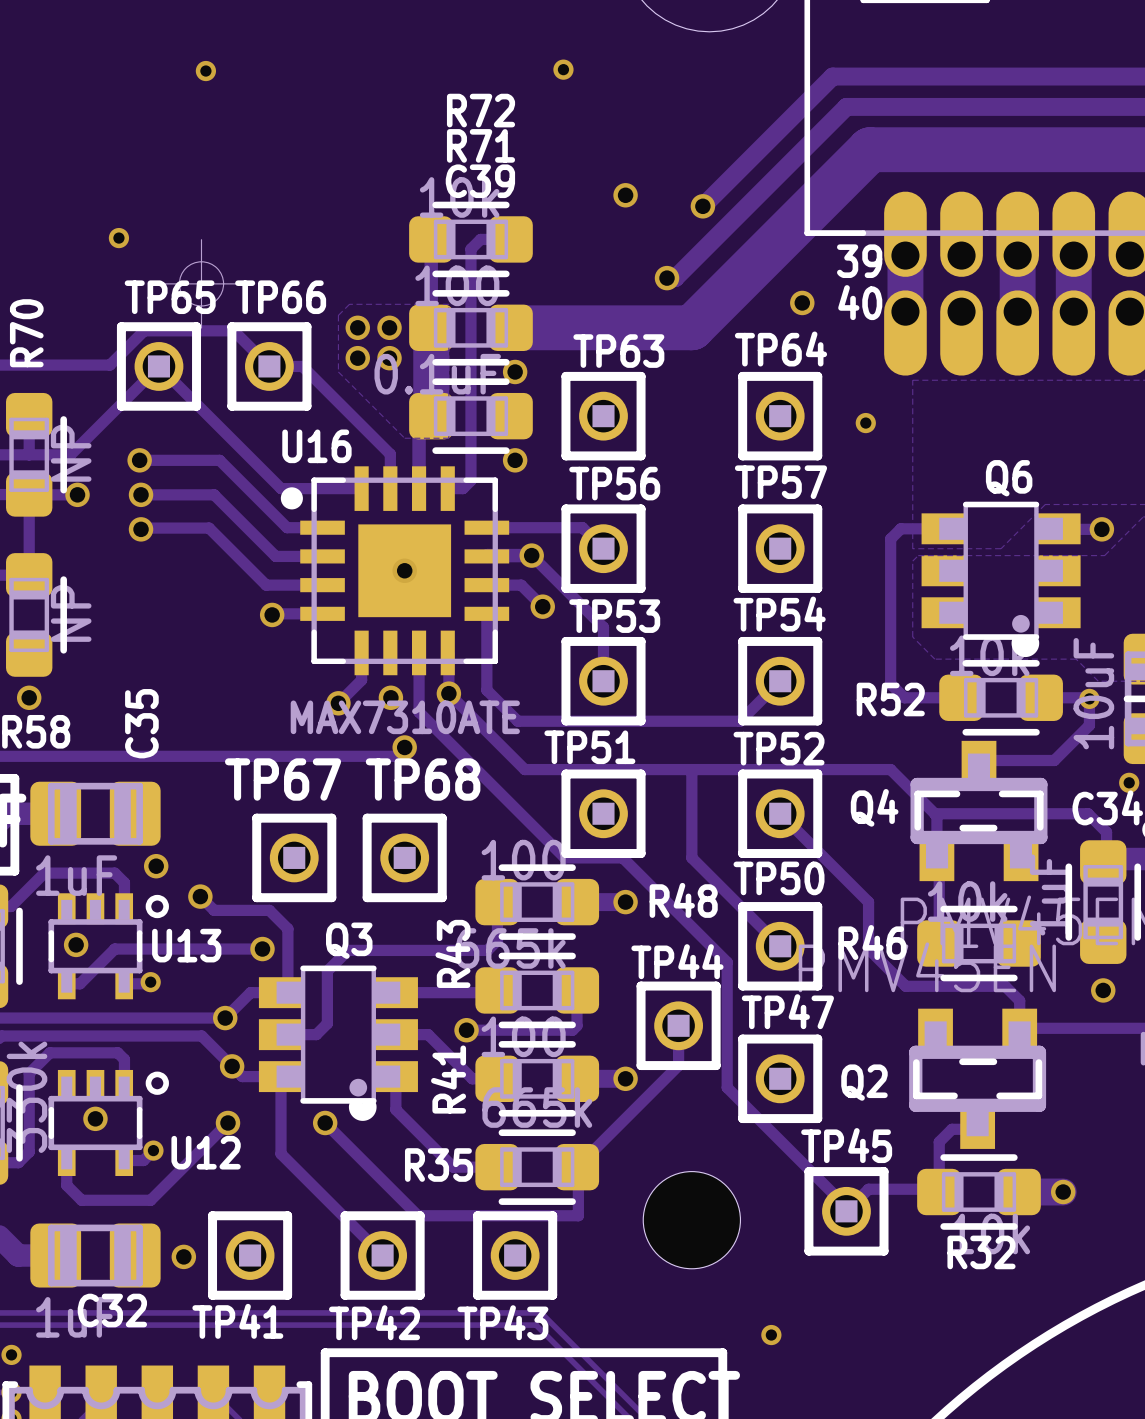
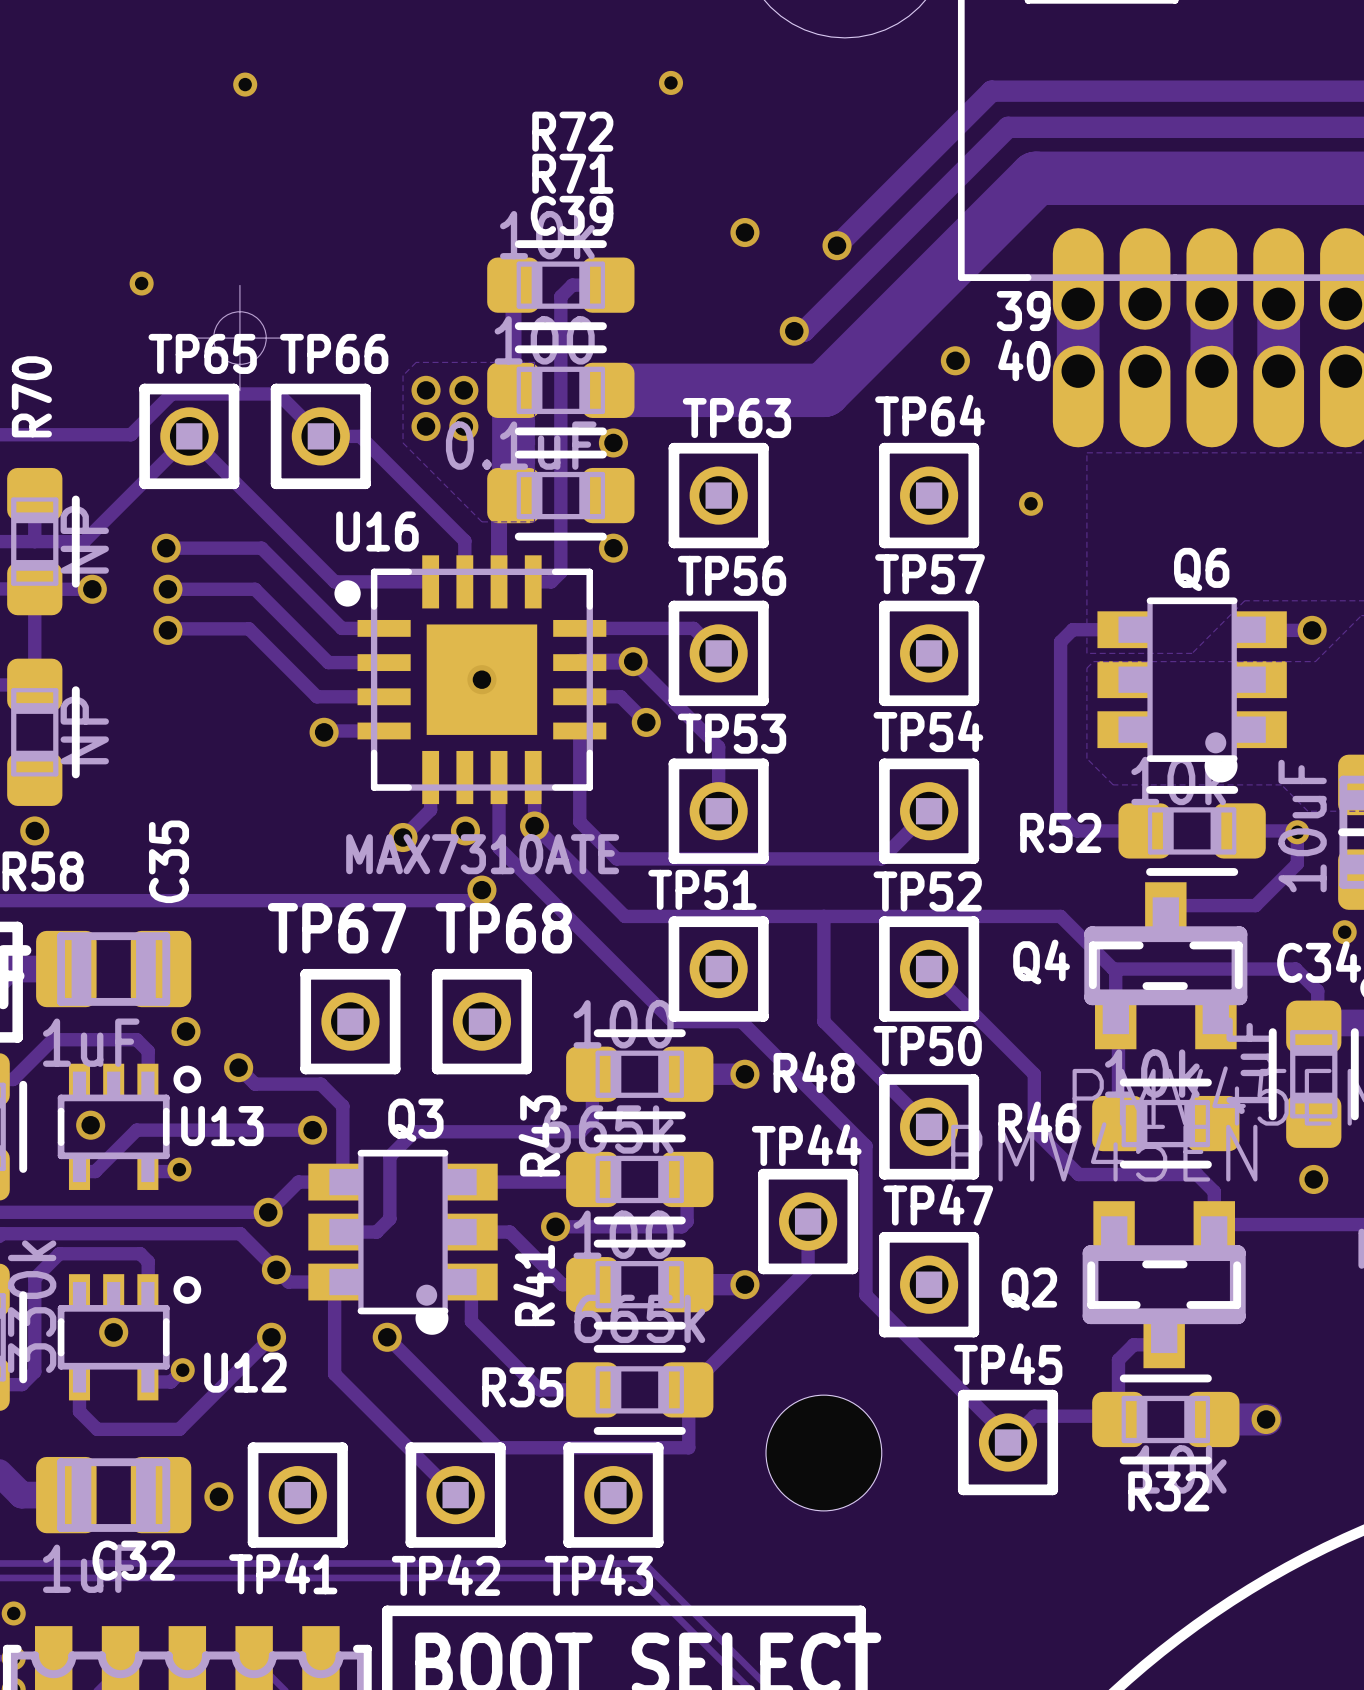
via: (771, 1335) -> none

